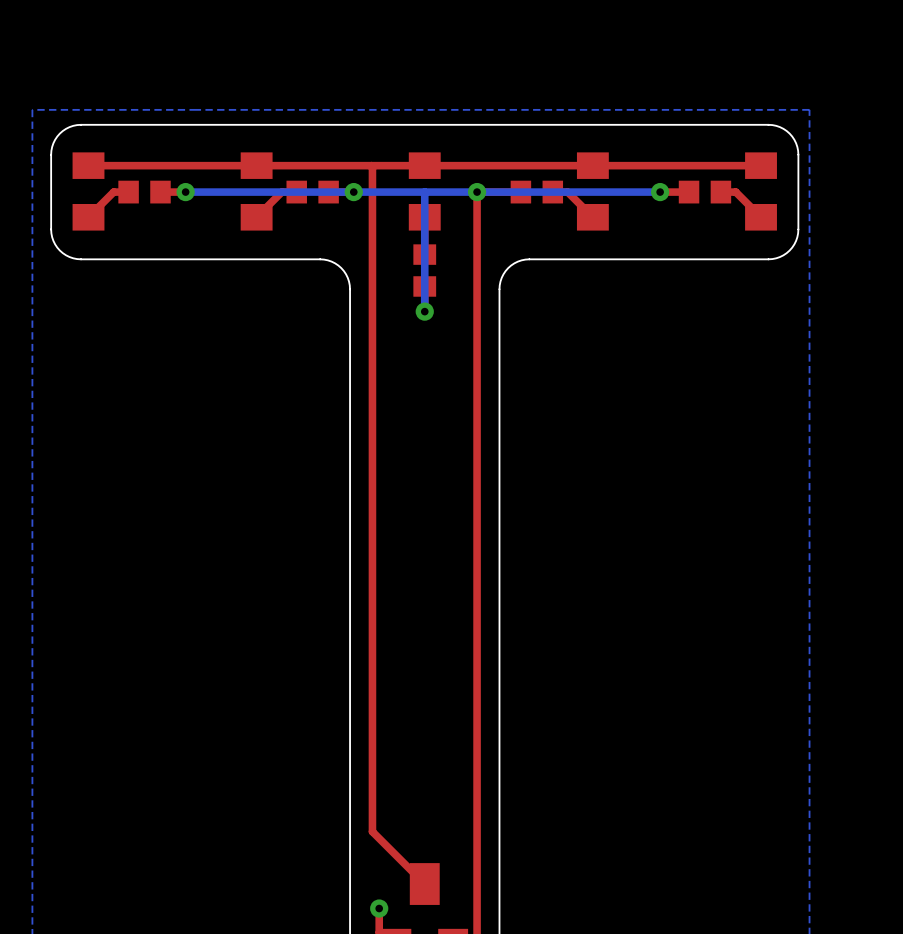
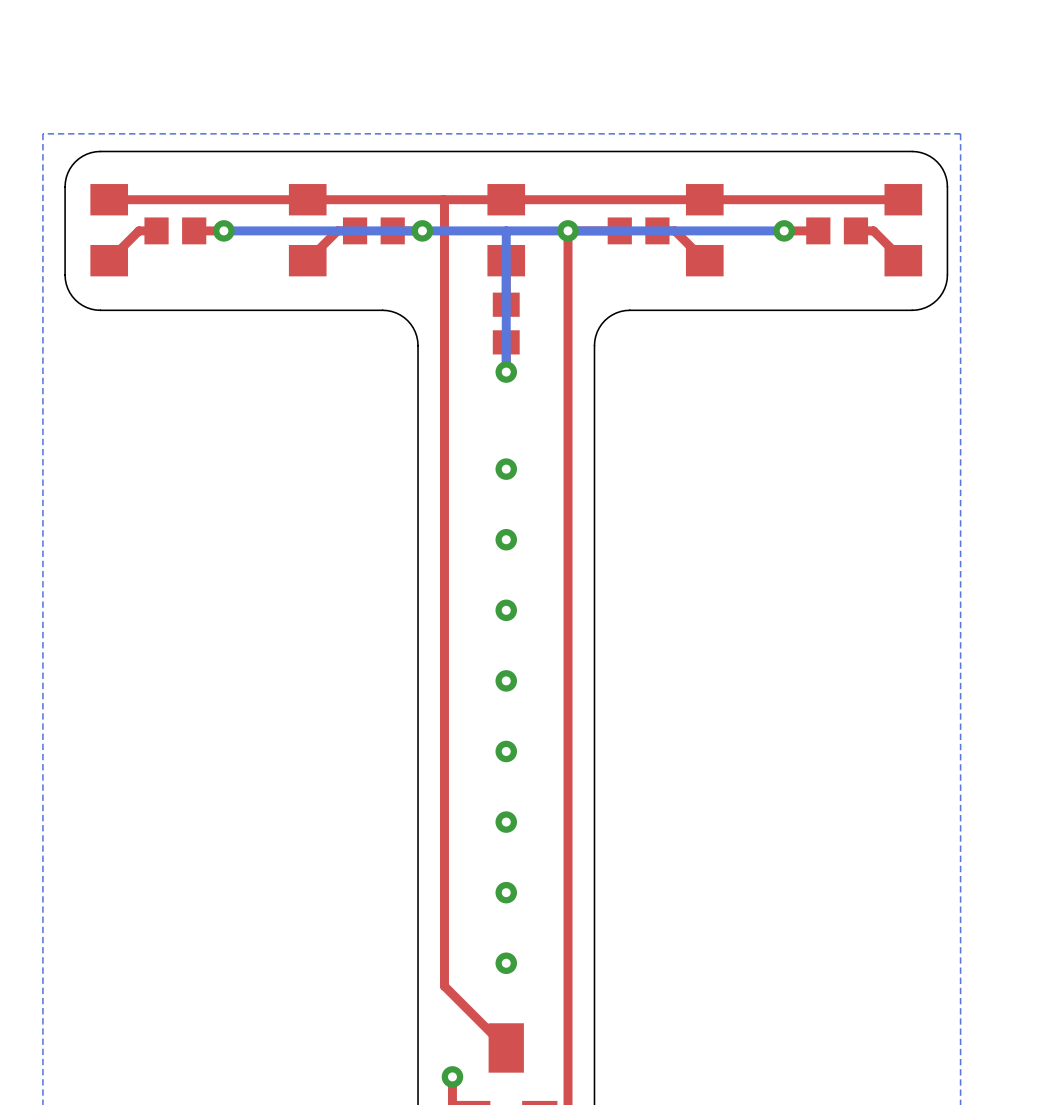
via: none -> (506, 469)
via: none -> (506, 539)
via: none -> (506, 610)
via: none -> (506, 680)
via: none -> (506, 751)
via: none -> (506, 822)
via: none -> (506, 892)
via: none -> (506, 963)

